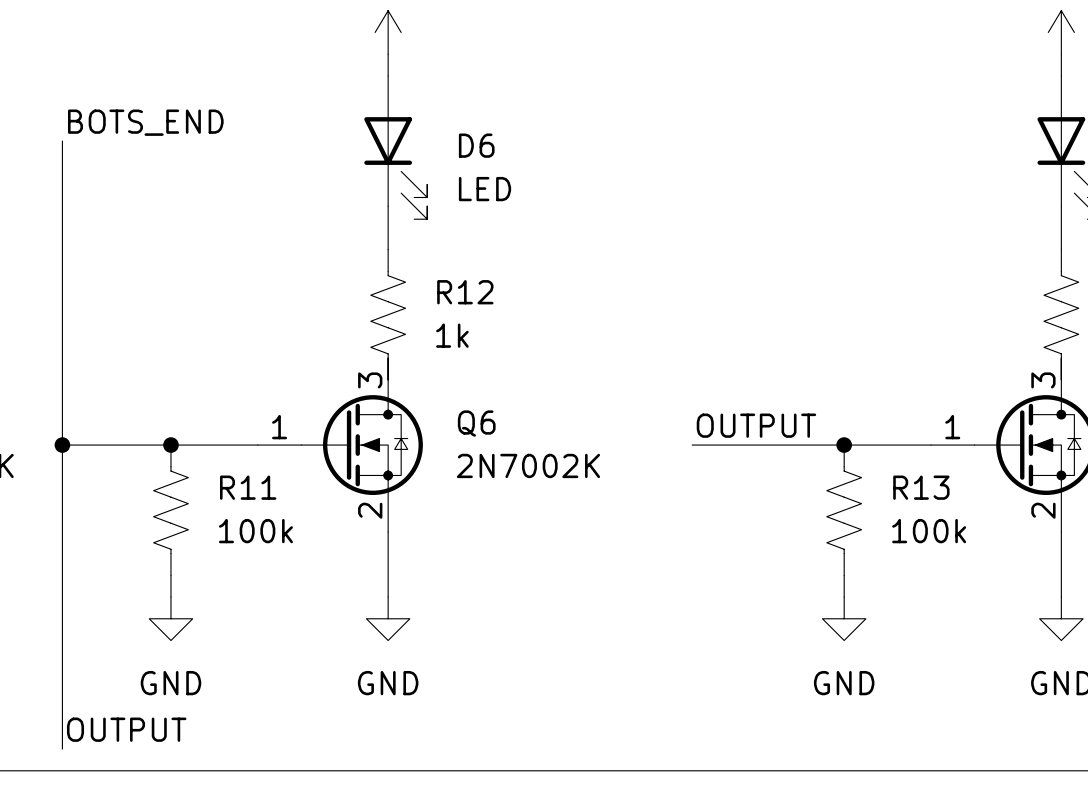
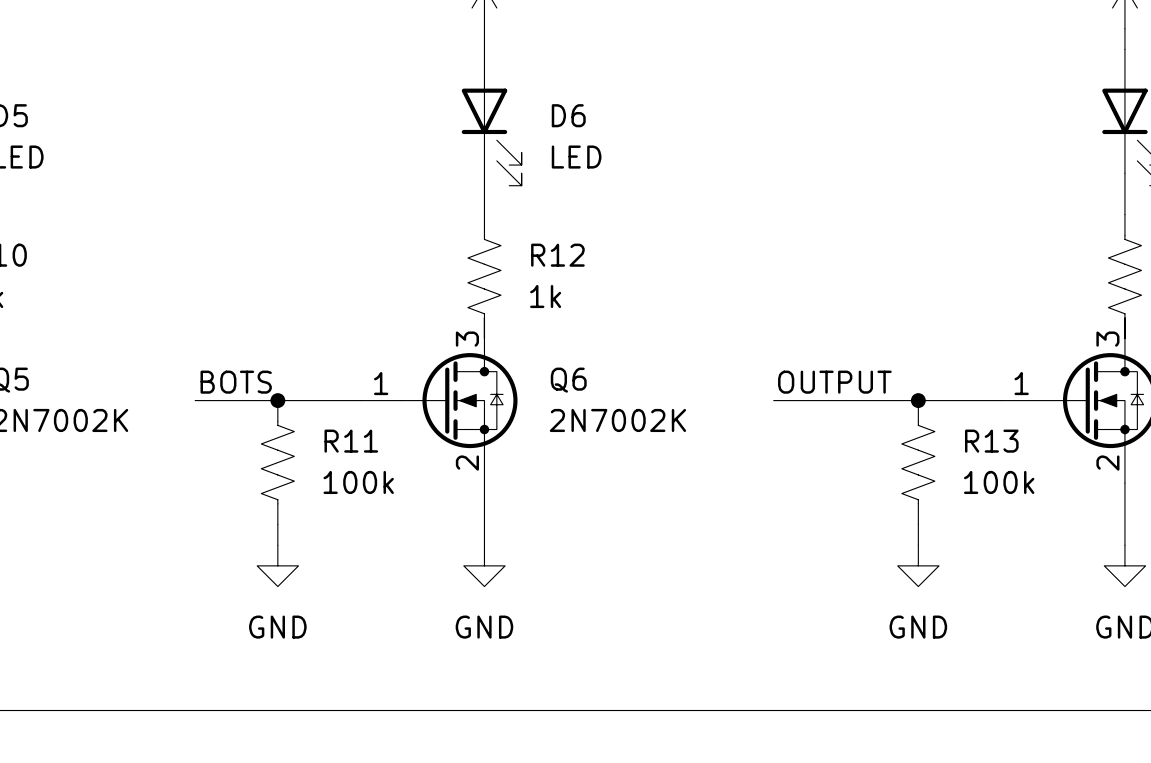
label: BOTS_END (145, 122) -> none
wire: (62, 141) (62, 749) -> none
label: none -> BOTS (236, 382)
wire: (62, 445) (84, 445) -> none
junction: (62, 445) -> none
label: OUTPUT (126, 729) -> none

